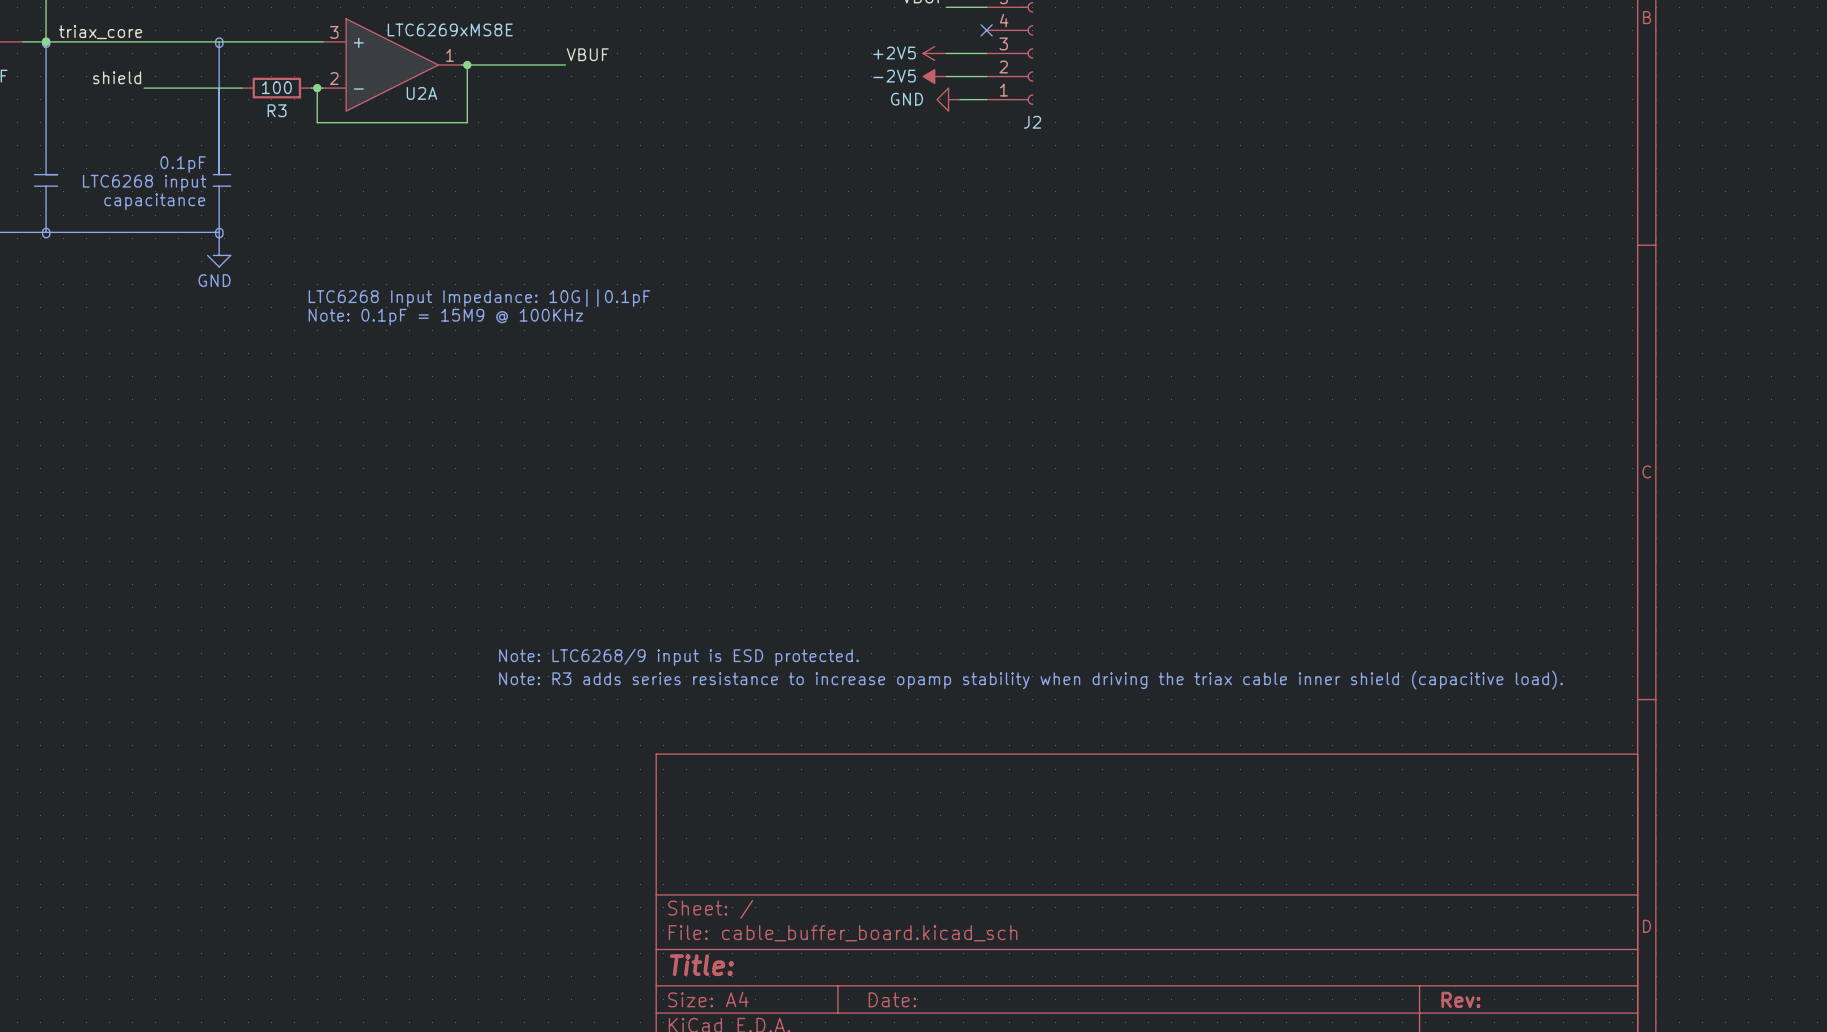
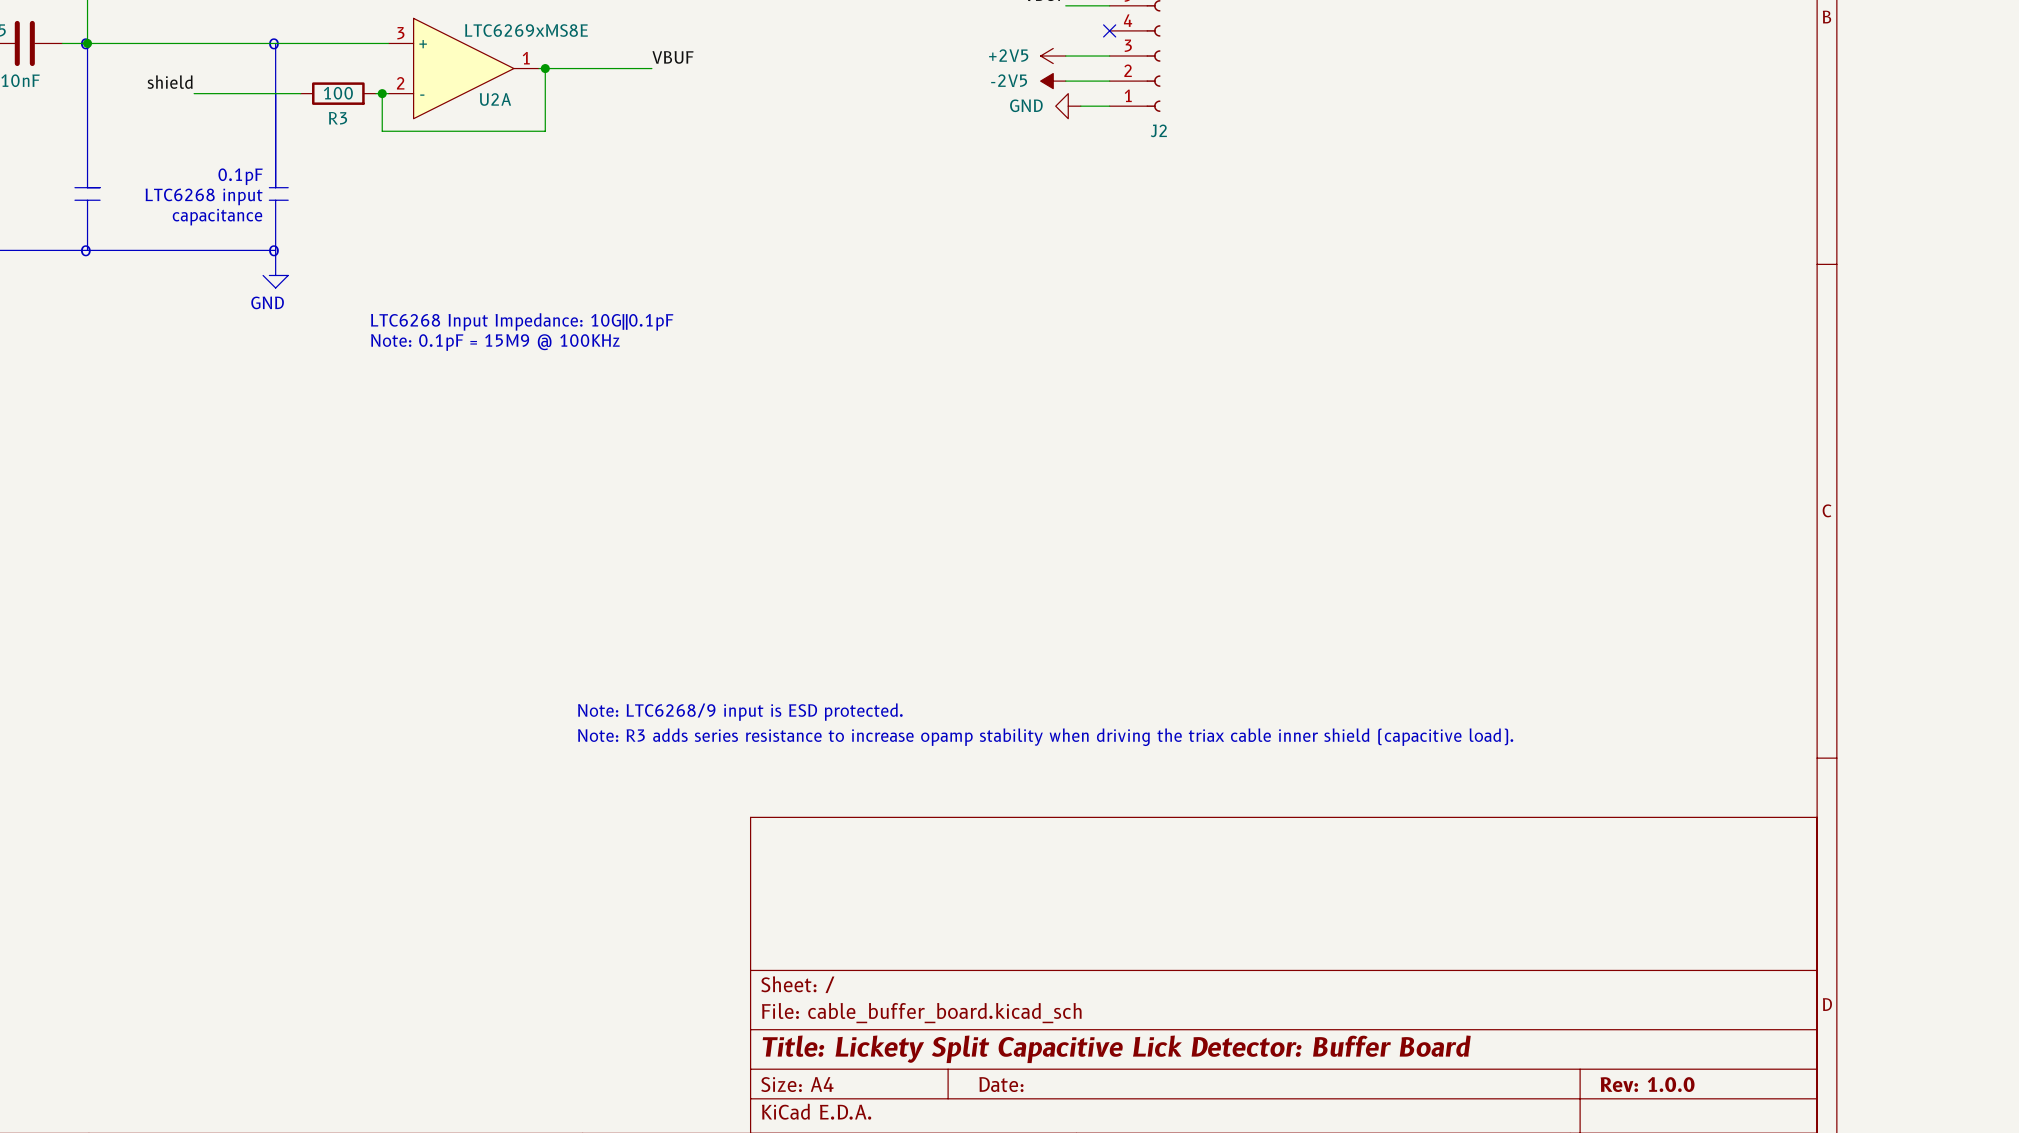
label: triax_core (100, 32) -> none
title block: Title: (701, 965) -> Title: Lickety Split Capacitive Lick Detector: Buffer Board (1116, 1049)
title block: Rev: (1460, 999) -> Rev: 1.0.0 (1647, 1084)

